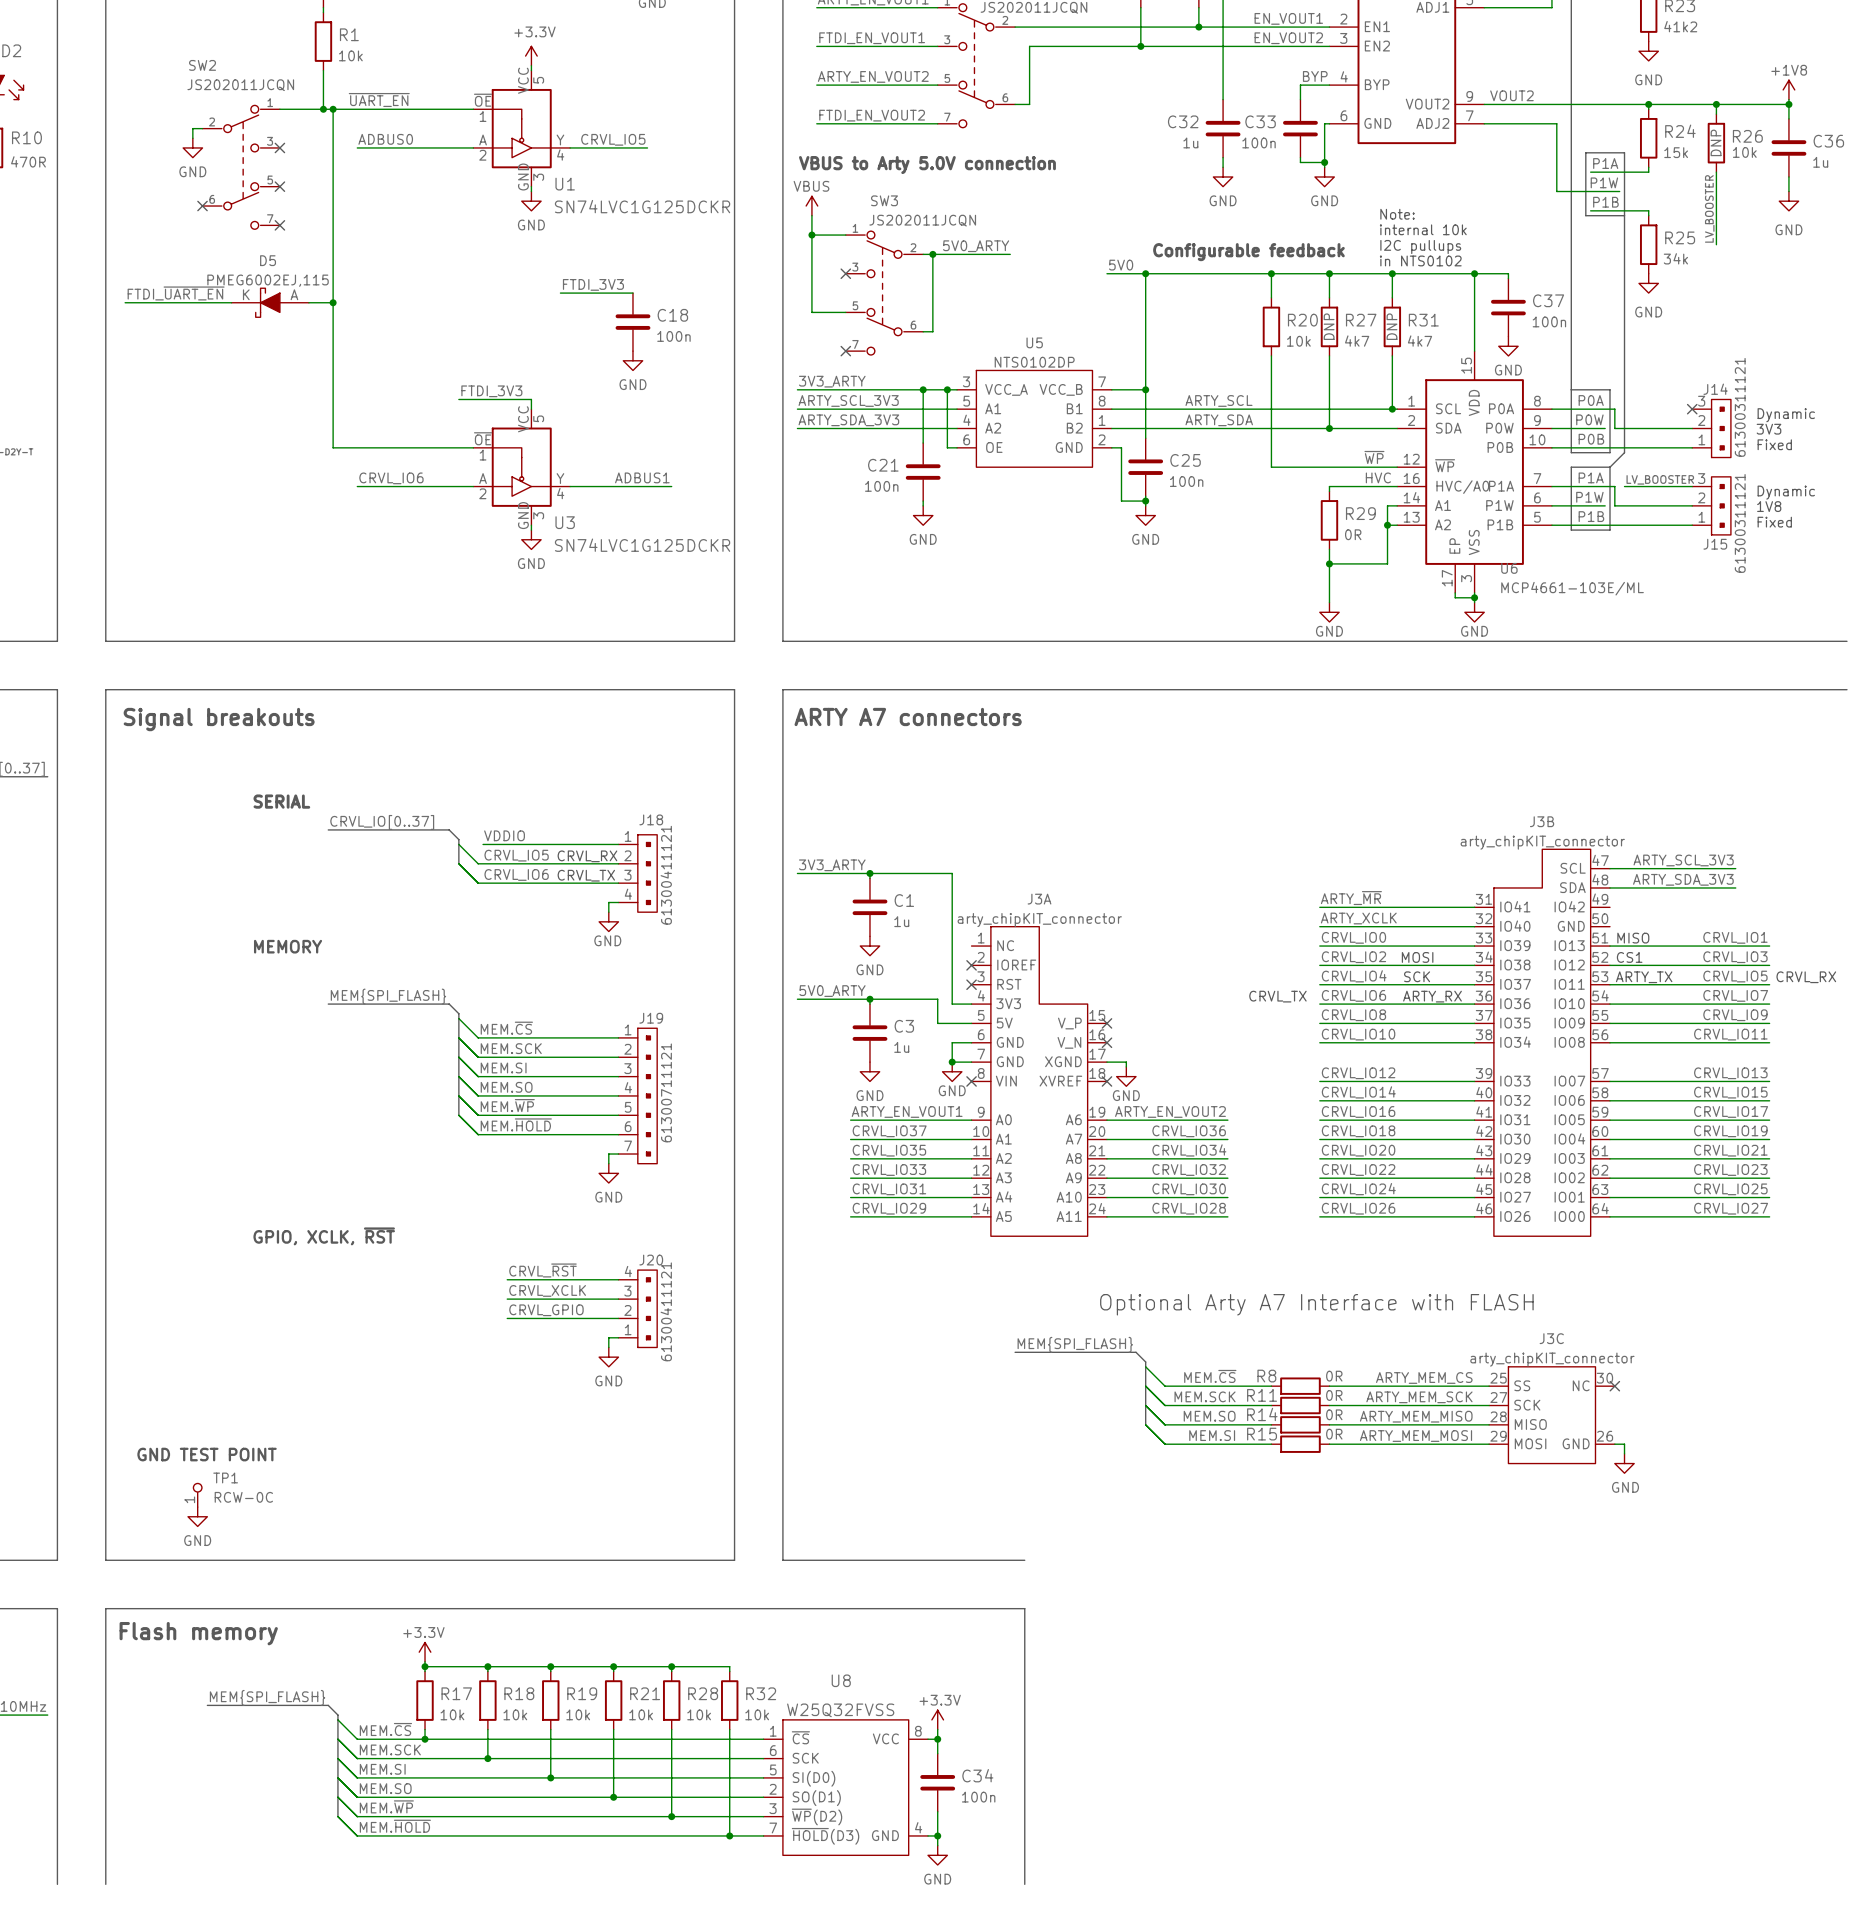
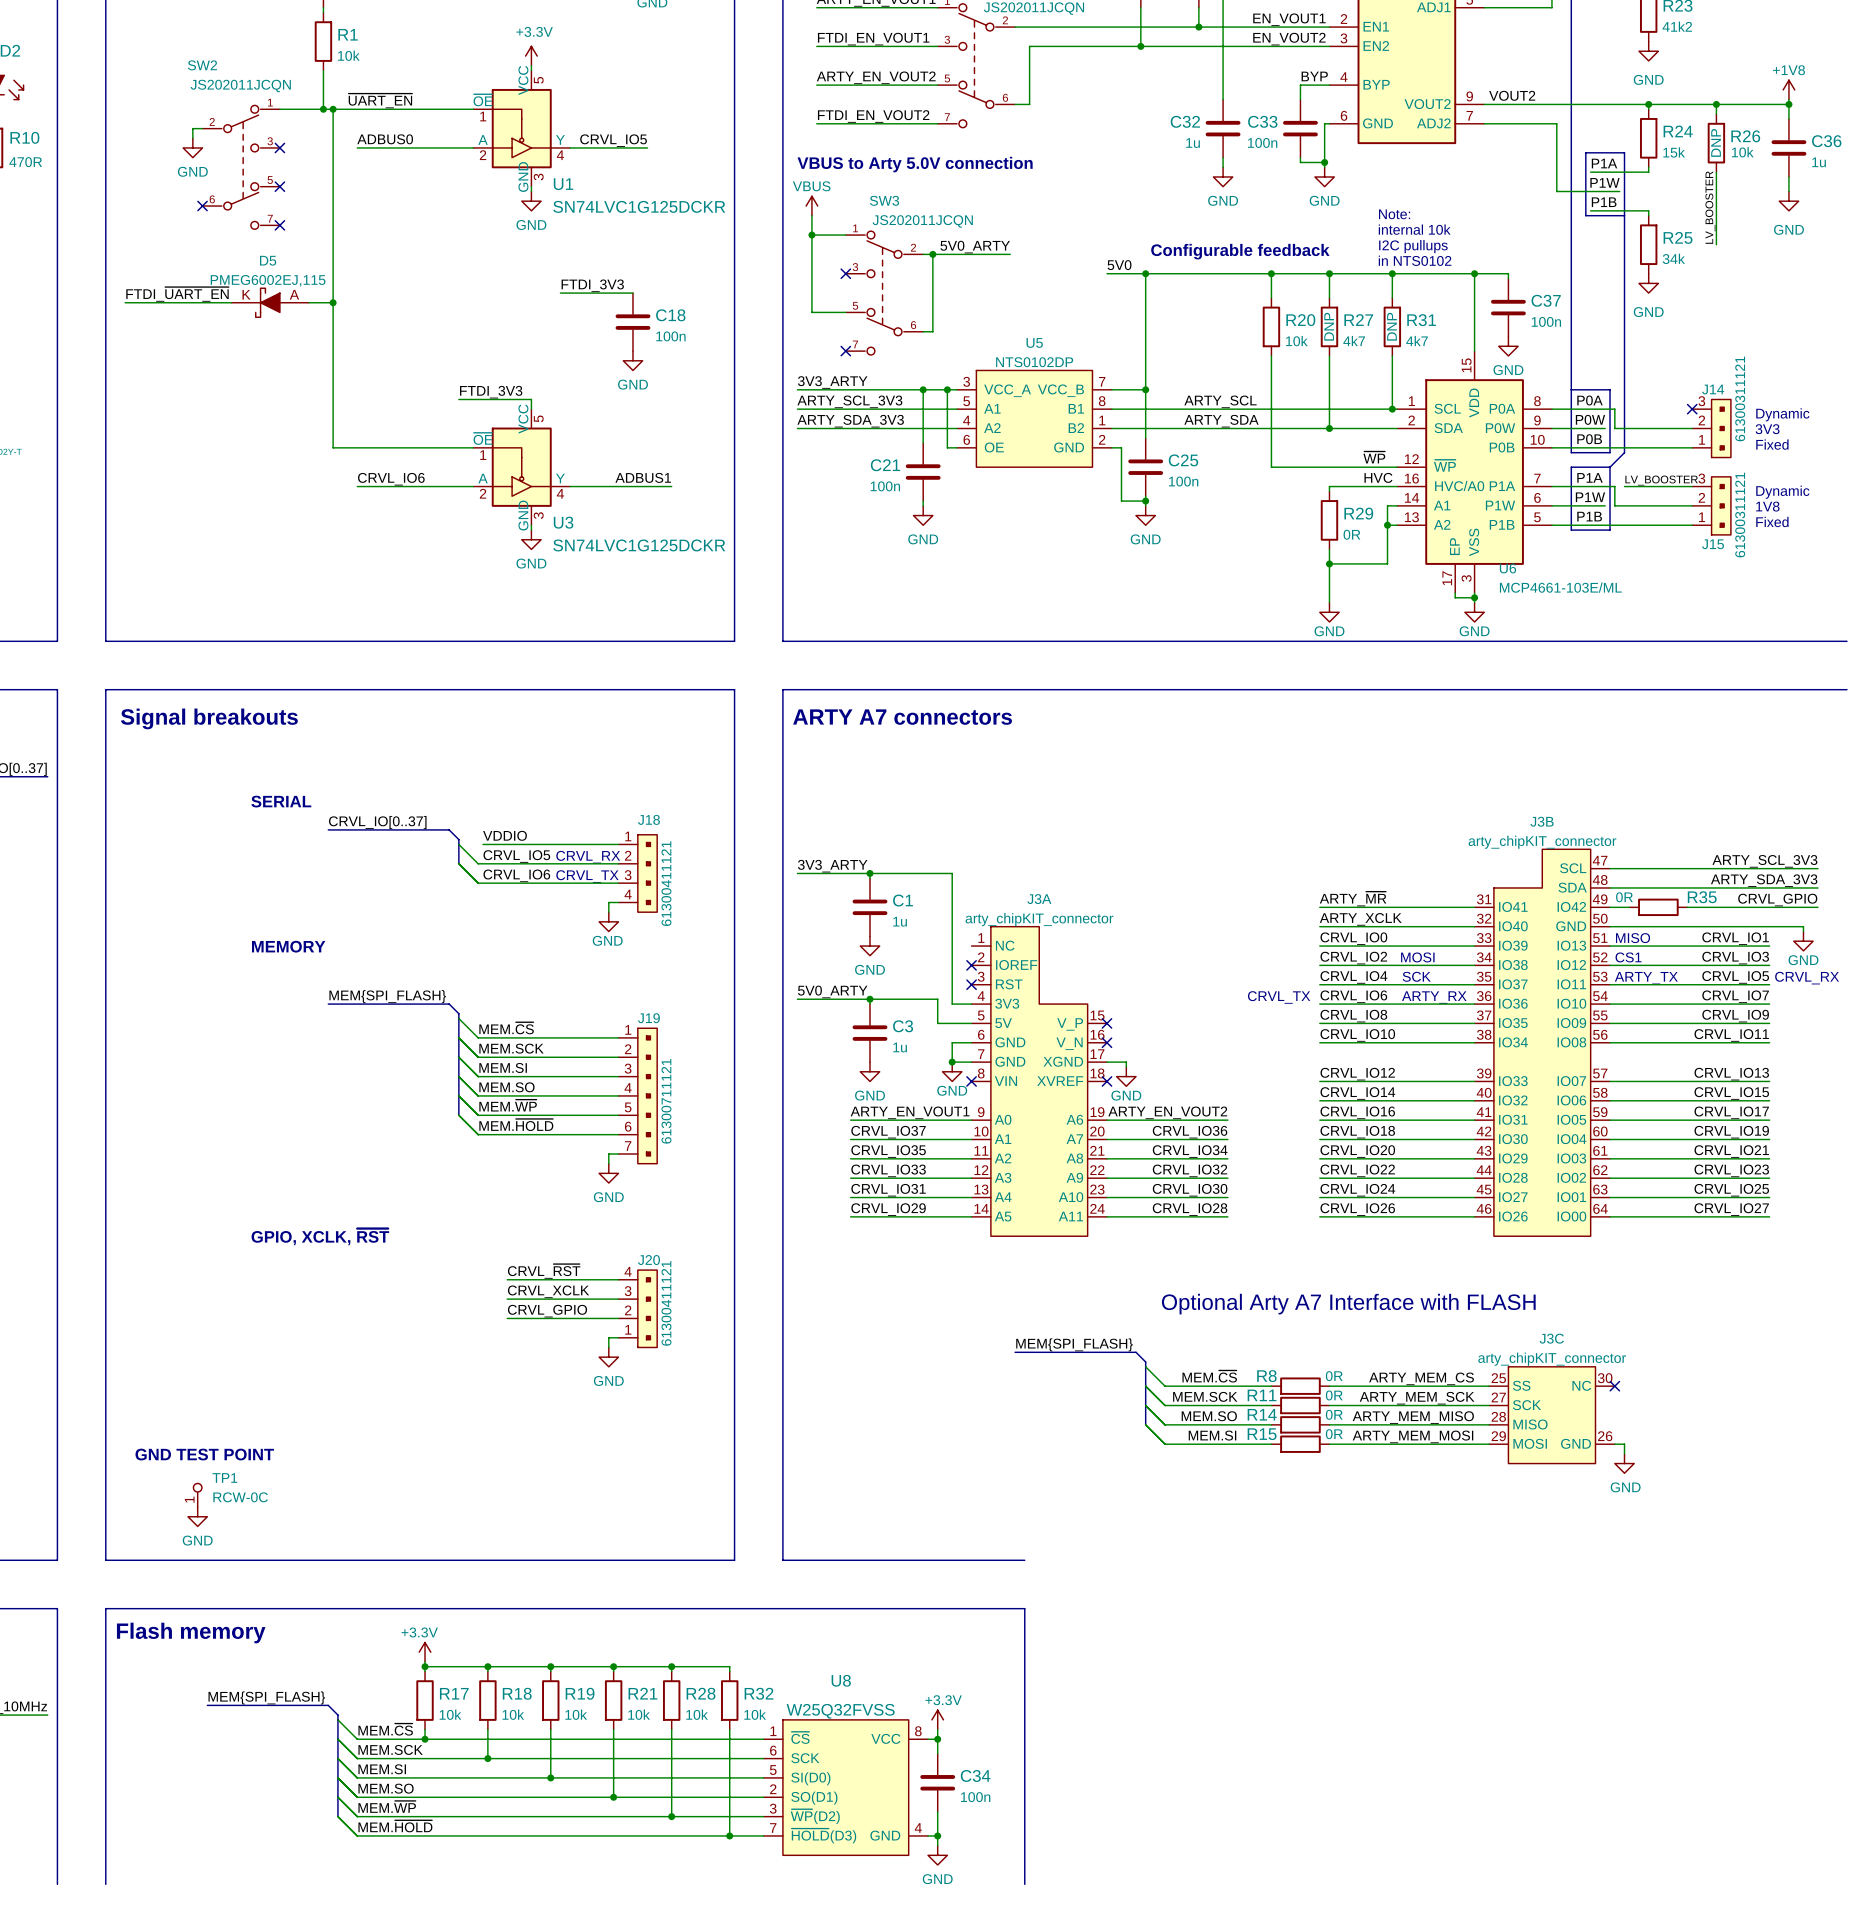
label position: ARTY_SCL_3V3 (1683, 860) -> ARTY_SCL_3V3 (1764, 861)
wire: none -> (1735, 868) (1817, 868)
label position: ARTY_SDA_3V3 (1683, 879) -> ARTY_SDA_3V3 (1764, 880)
wire: none -> (1735, 887) (1817, 887)
label: none -> CRVL_GPIO (1777, 900)
wire: none -> (1610, 907) (1629, 907)
R35: none -> (1658, 907)
wire: none -> (1687, 907) (1817, 907)
wire: none -> (1610, 926) (1803, 926) (1803, 931)
power symbol: none -> GND (1803, 941)

